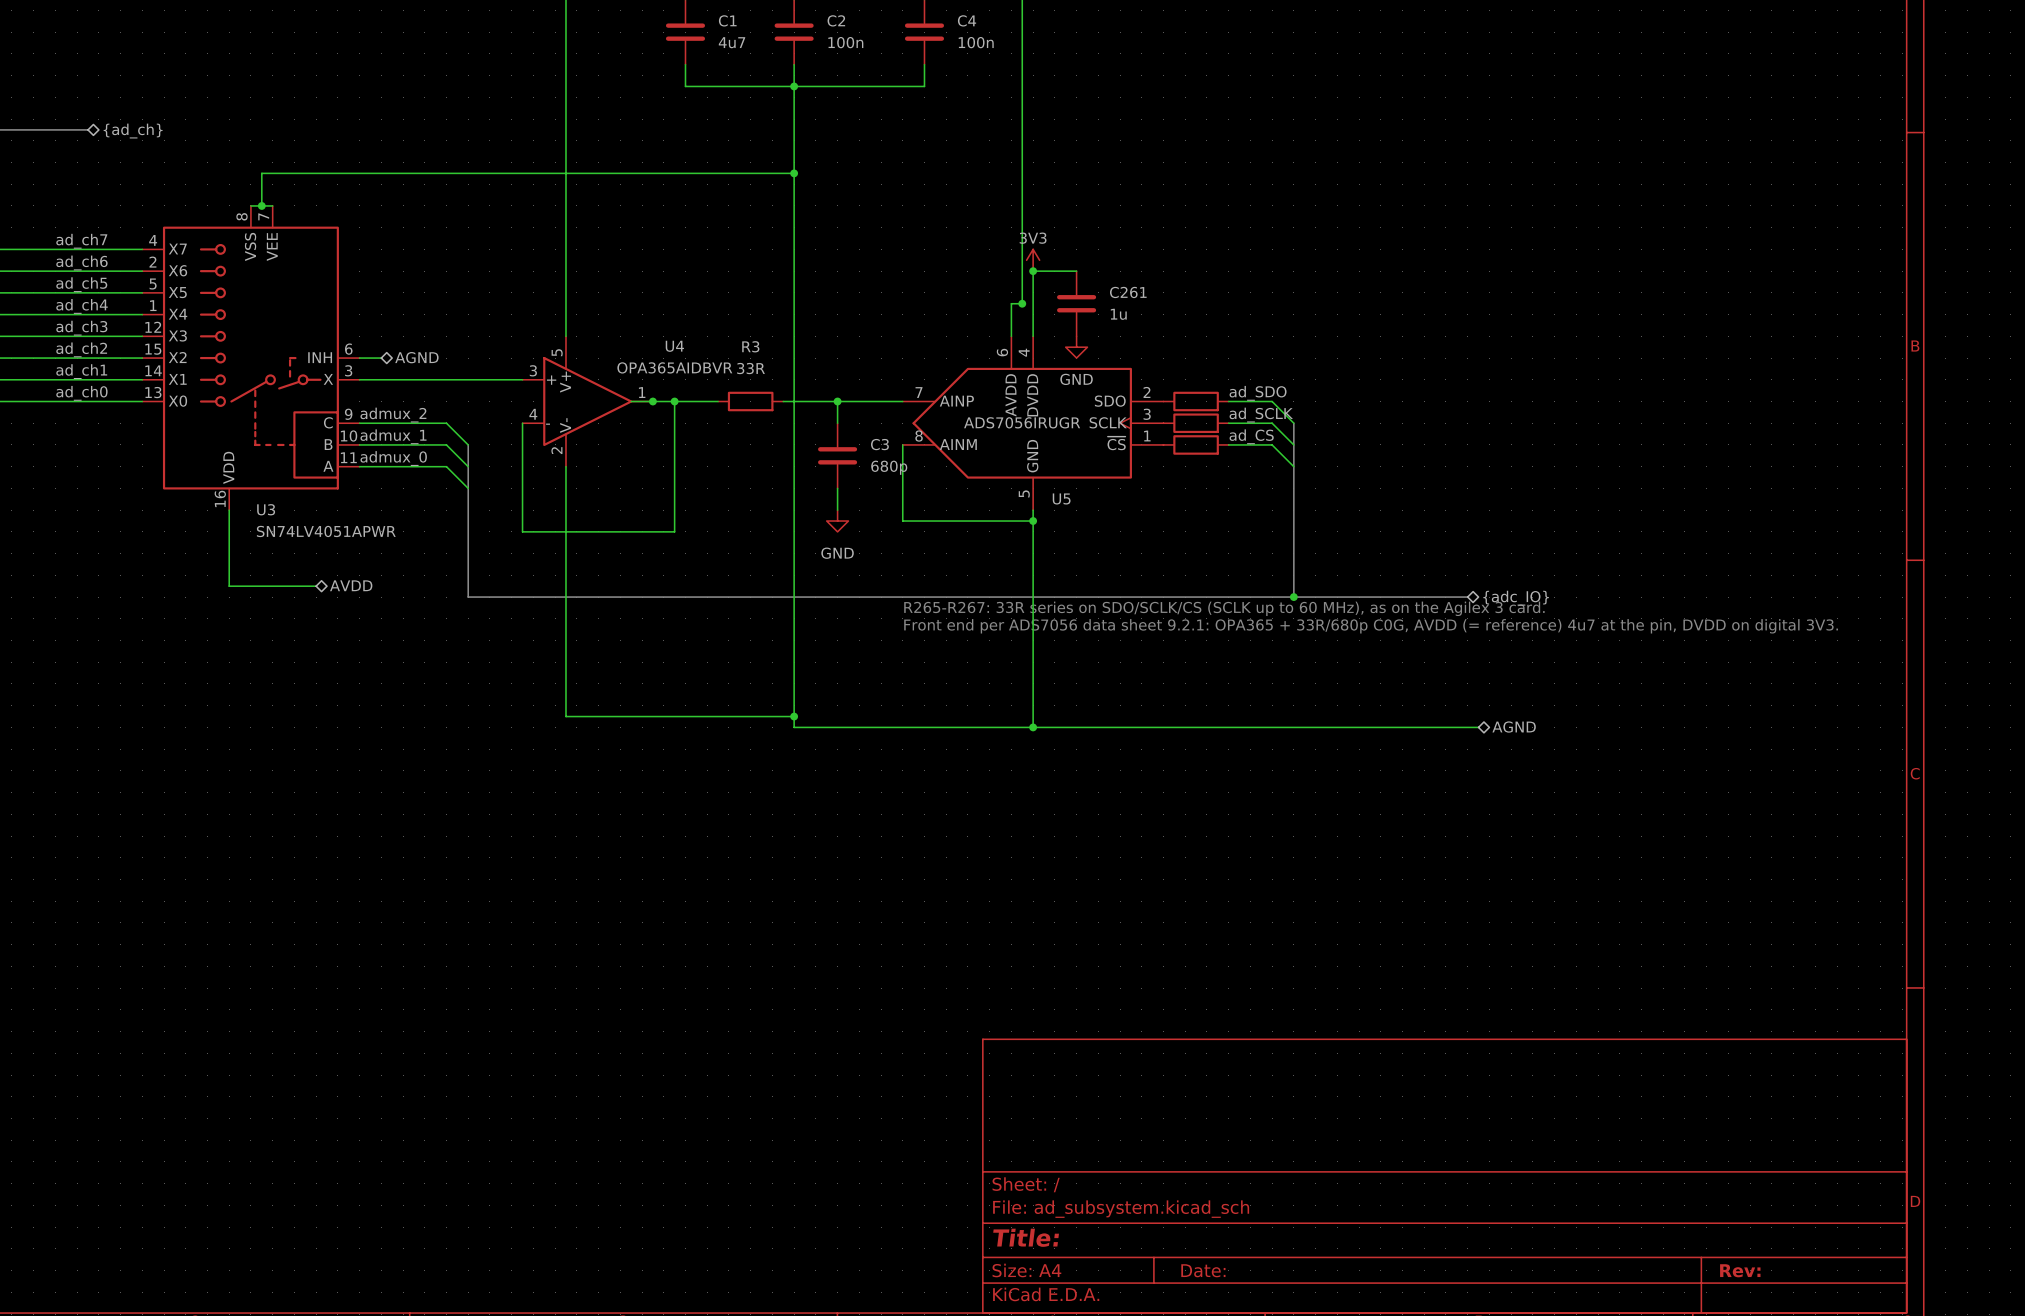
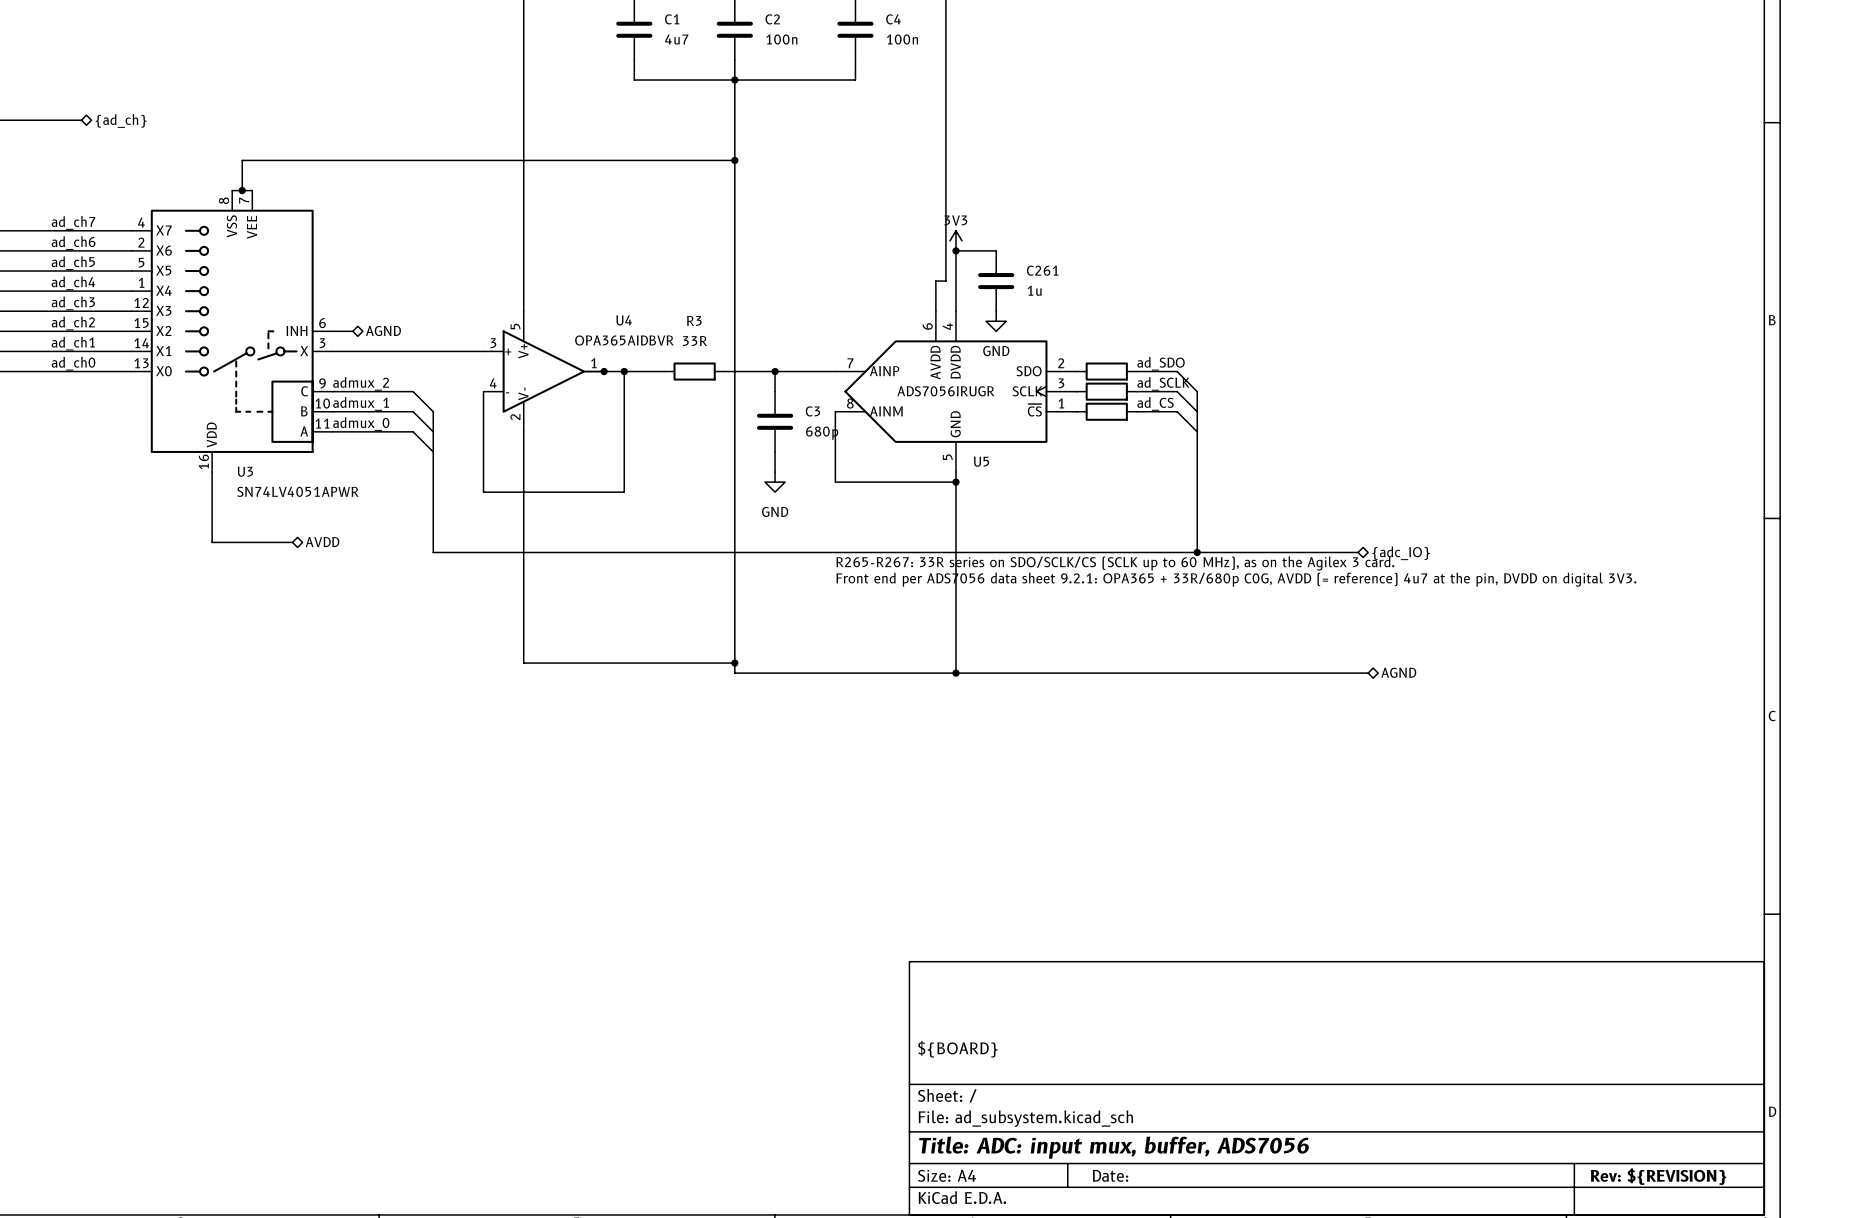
junction: (1022, 303) -> none
title block: none -> ${BOARD} (957, 1049)
title block: Title: (1026, 1237) -> Title: ADC: input mux, buffer, ADS7056 (1114, 1147)
title block: Rev: (1740, 1270) -> Rev: ${REVISION} (1658, 1176)

